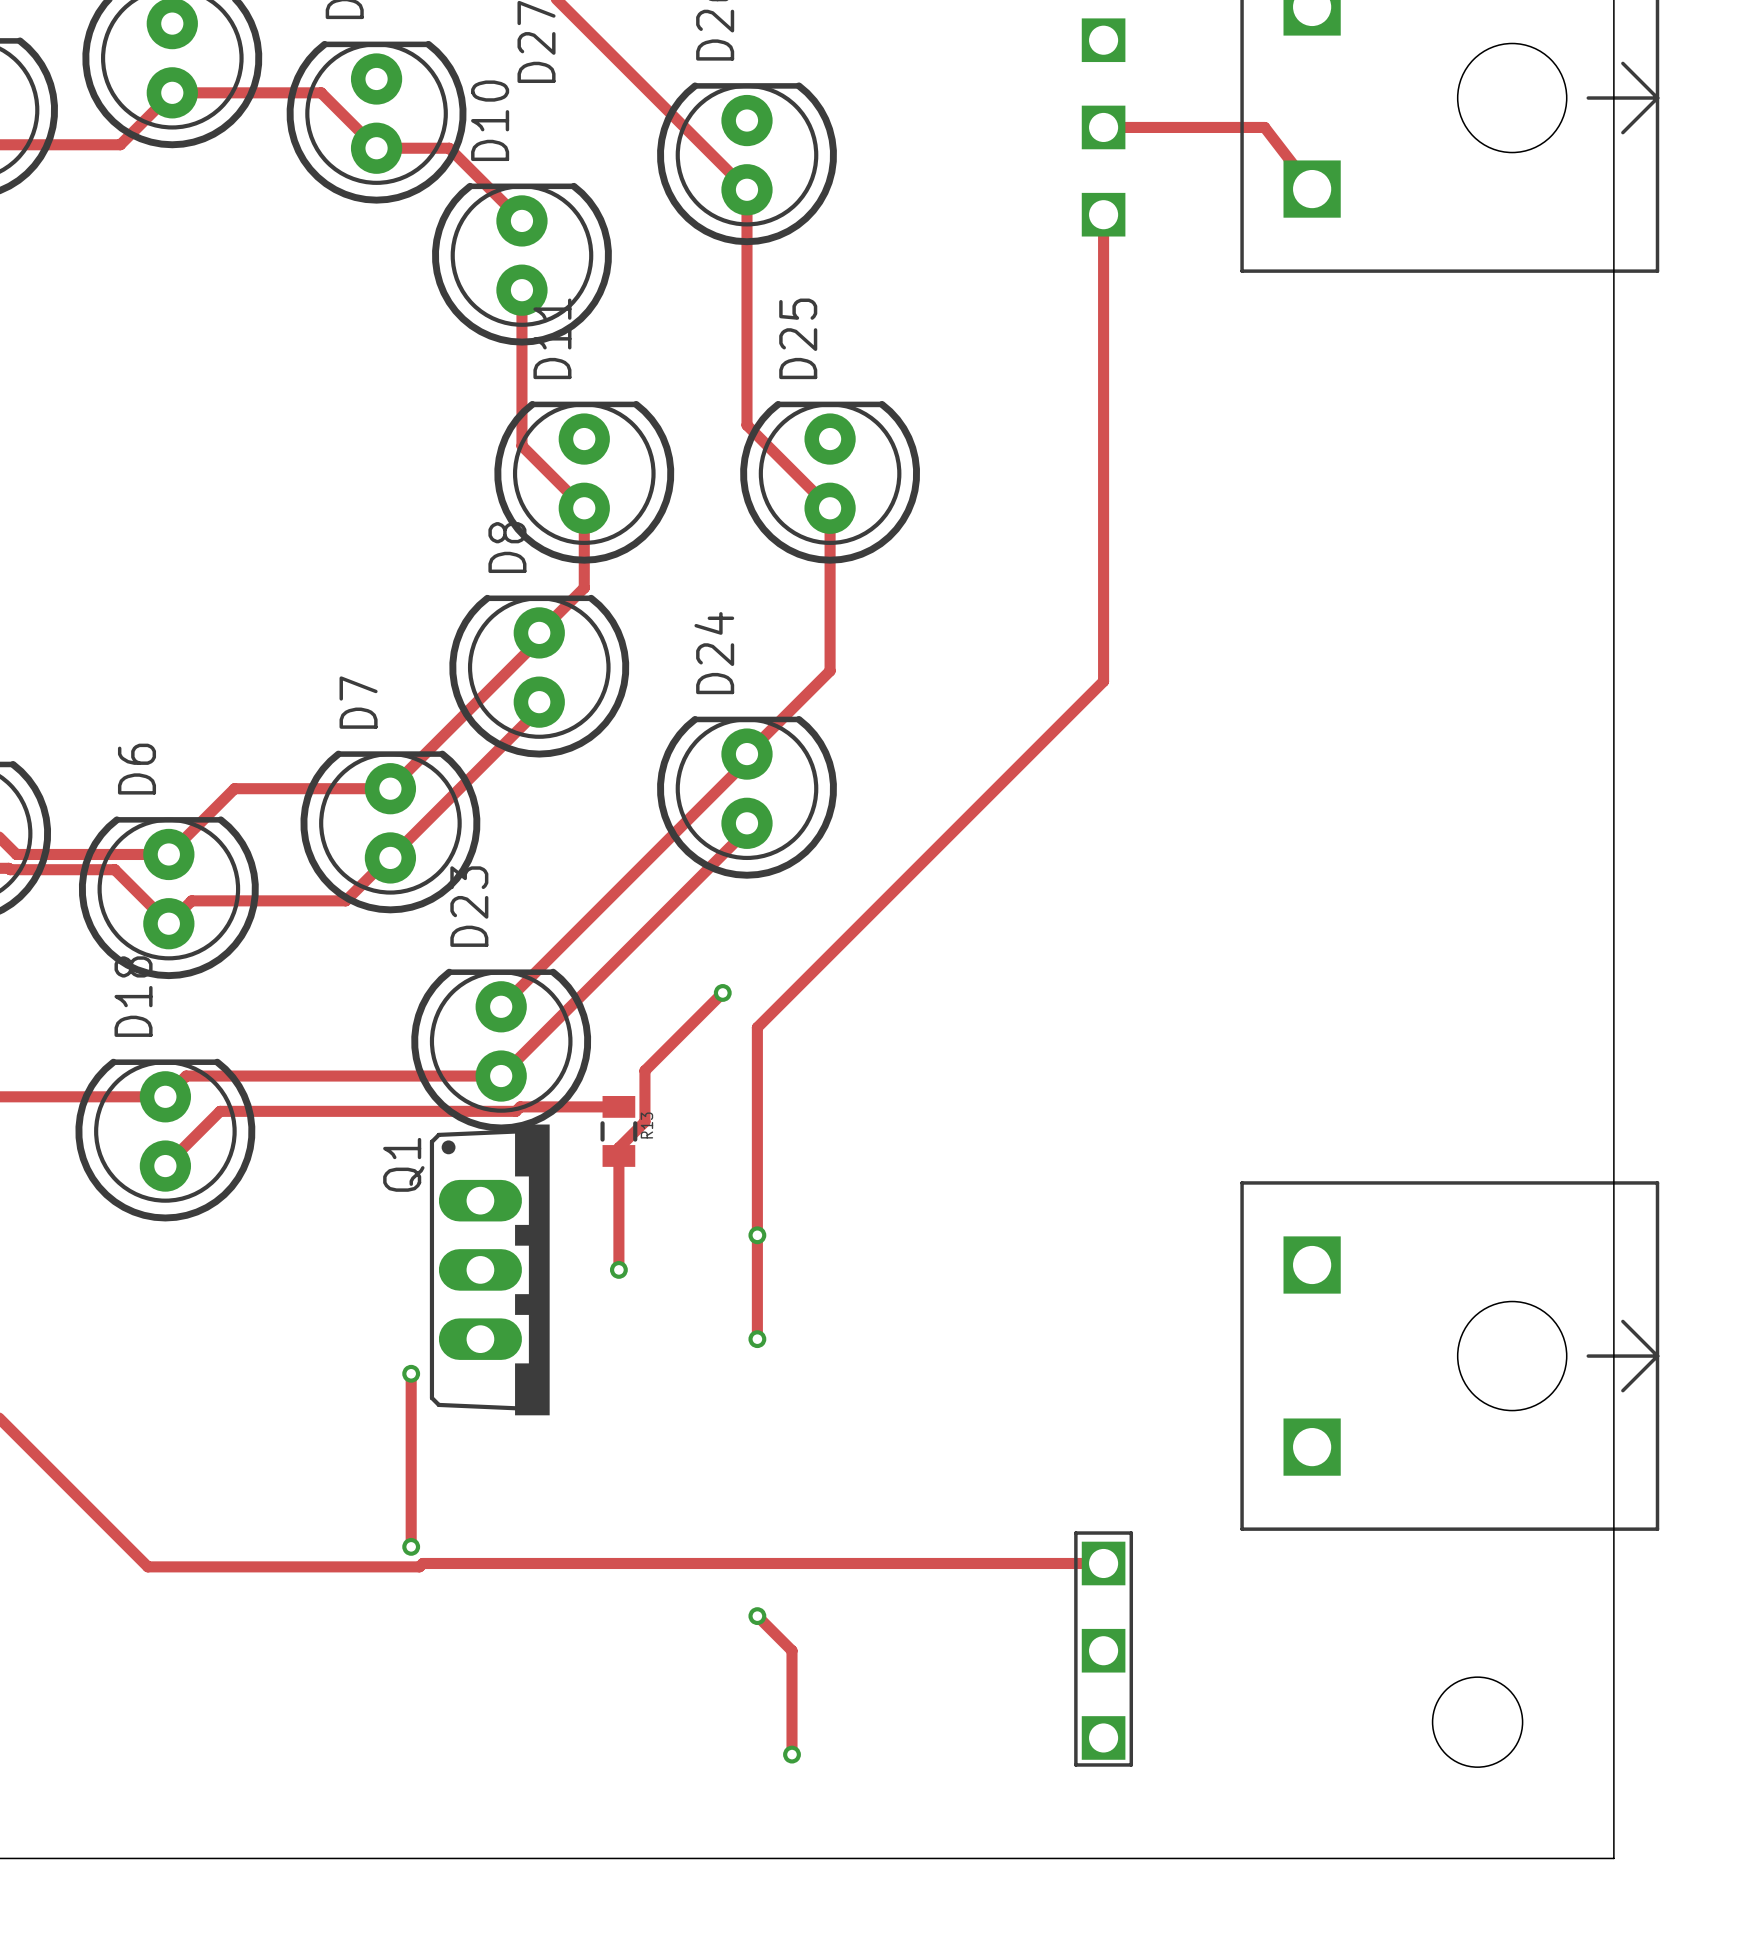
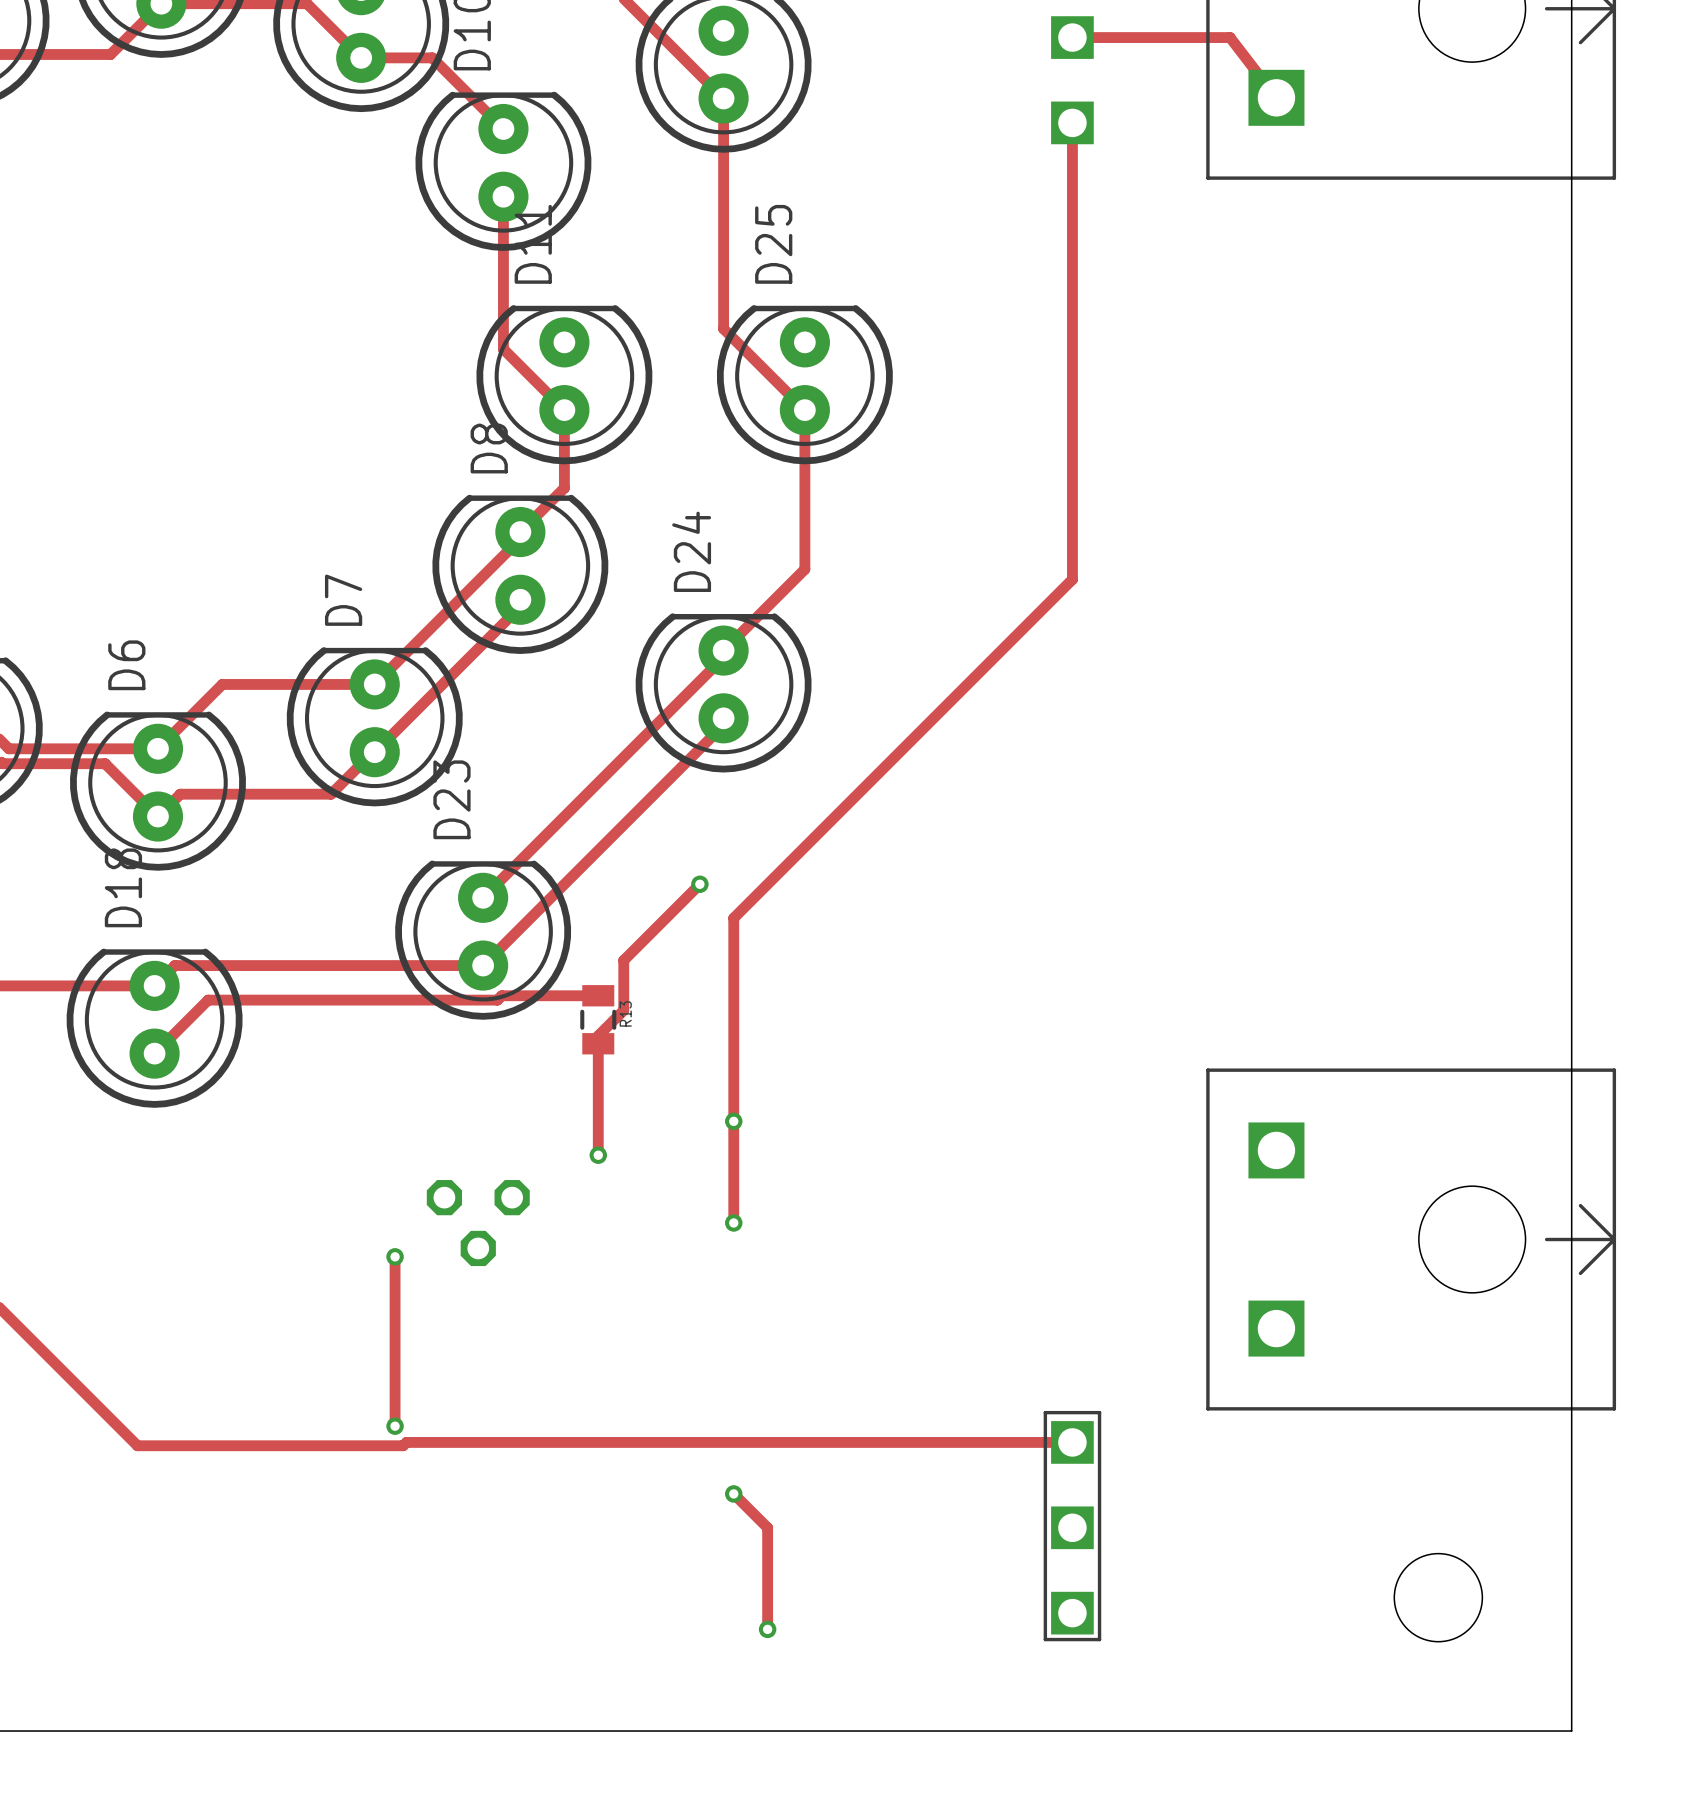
Q1: (489, 1269) -> none
part: none -> (478, 1223)

